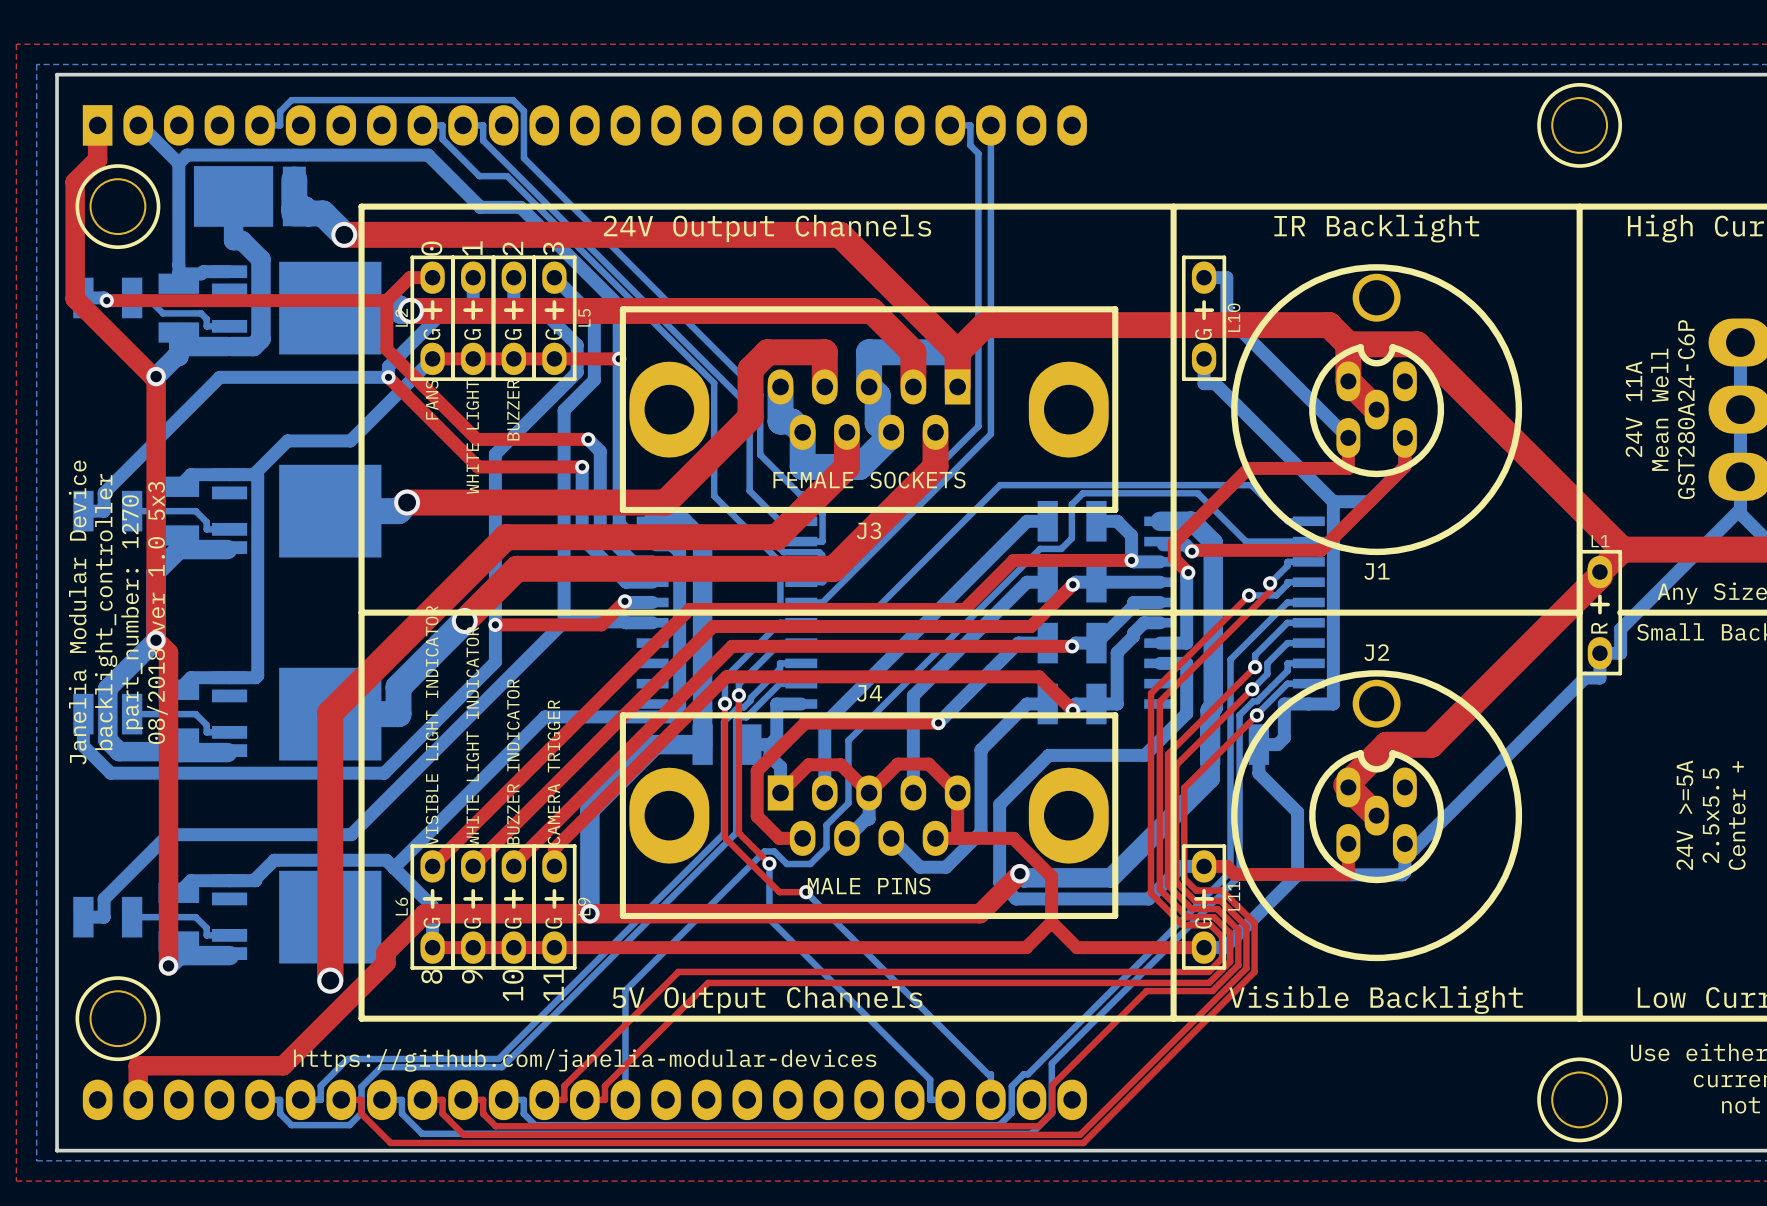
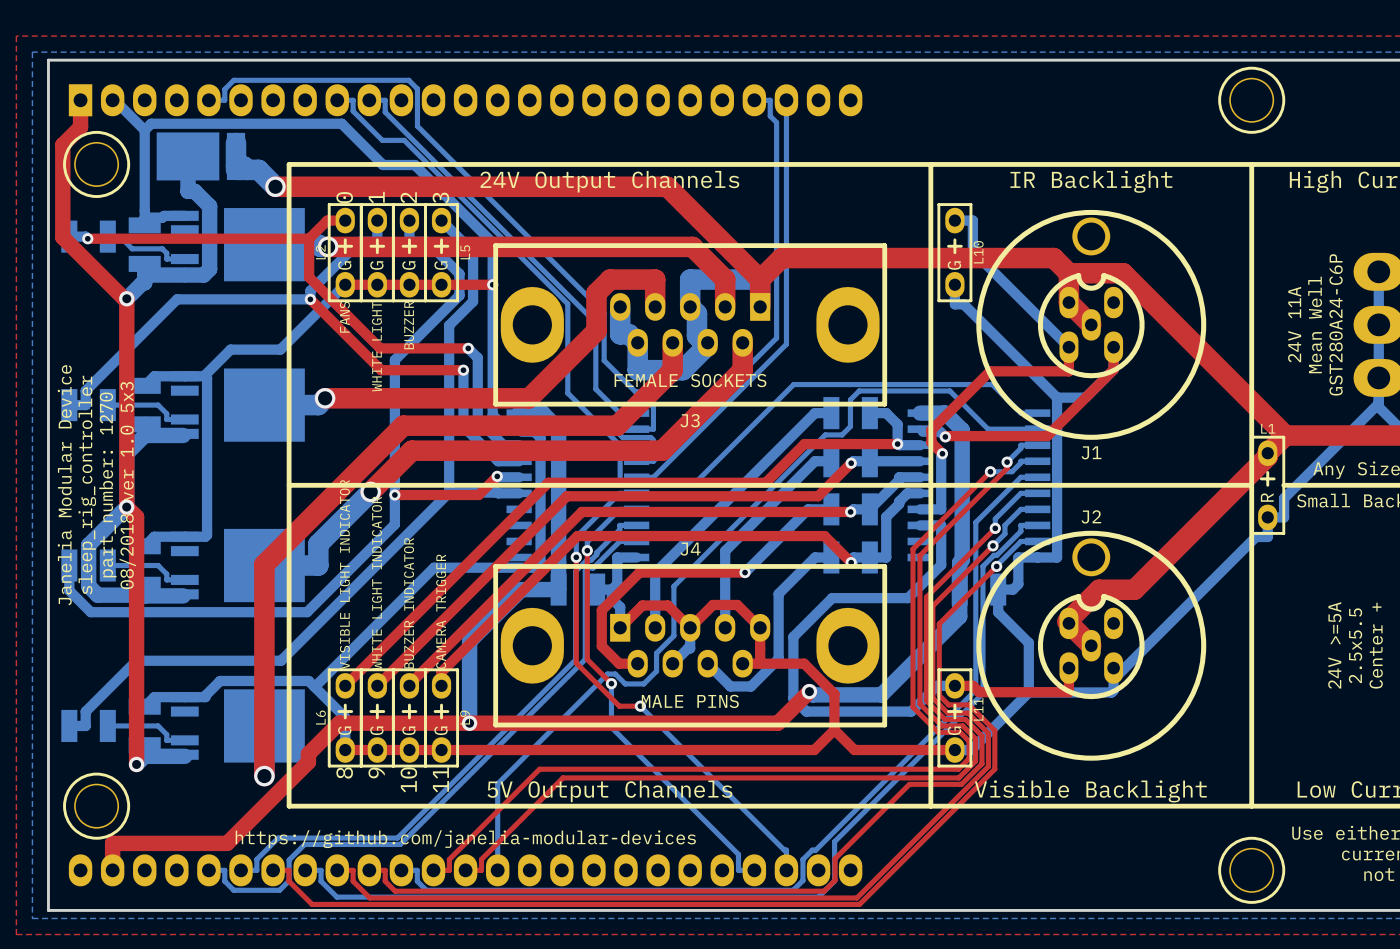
text: backlight_controller (106, 612) -> sleep_rig_controller (87, 485)

